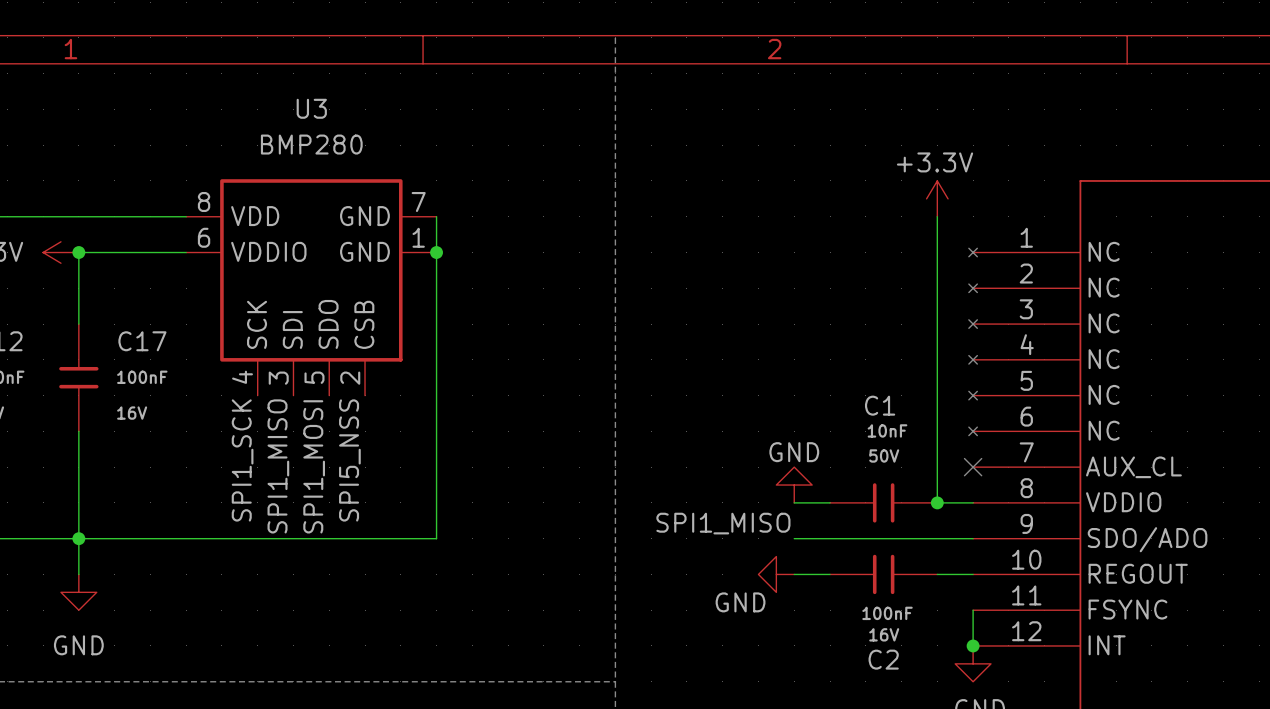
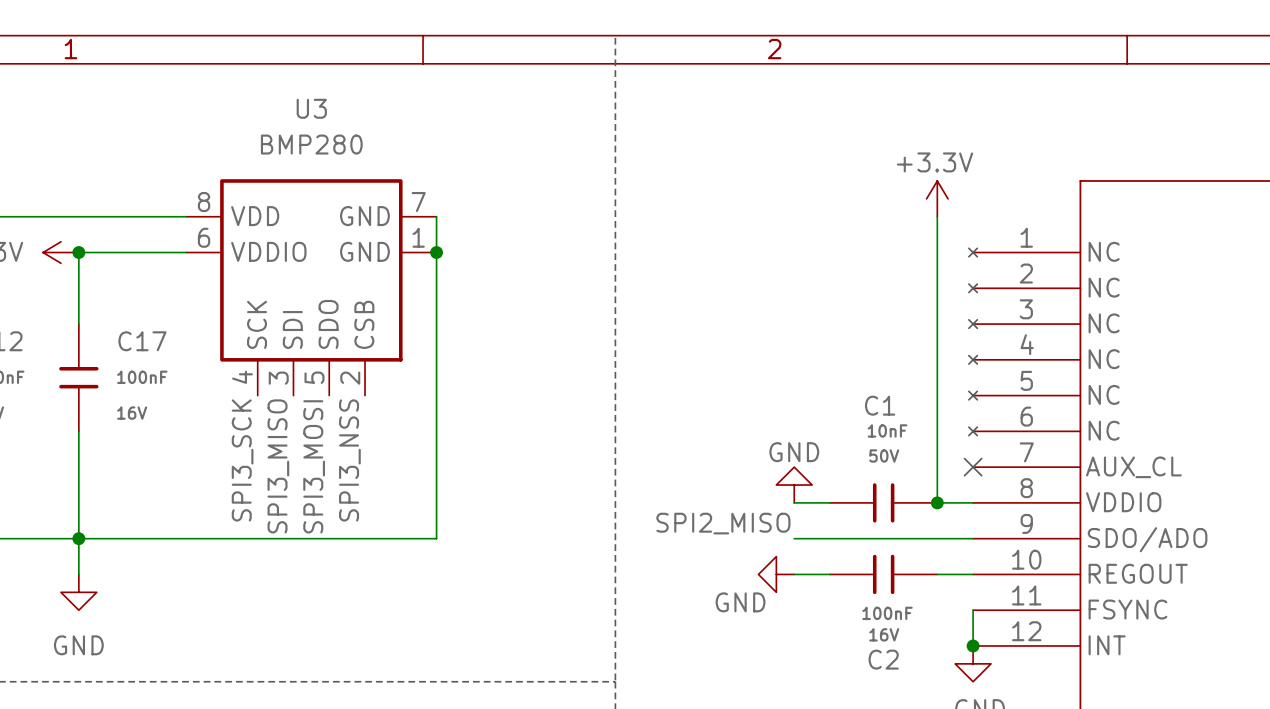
label: SPI1_SCK (242, 460) -> SPI3_SCK (242, 460)
label: SPI5_NSS (349, 460) -> SPI3_NSS (349, 460)
label: SPI1_MISO (278, 466) -> SPI3_MISO (278, 466)
label: SPI1_MOSI (314, 466) -> SPI3_MOSI (314, 466)
label: SPI1_MISO (723, 523) -> SPI2_MISO (723, 523)

